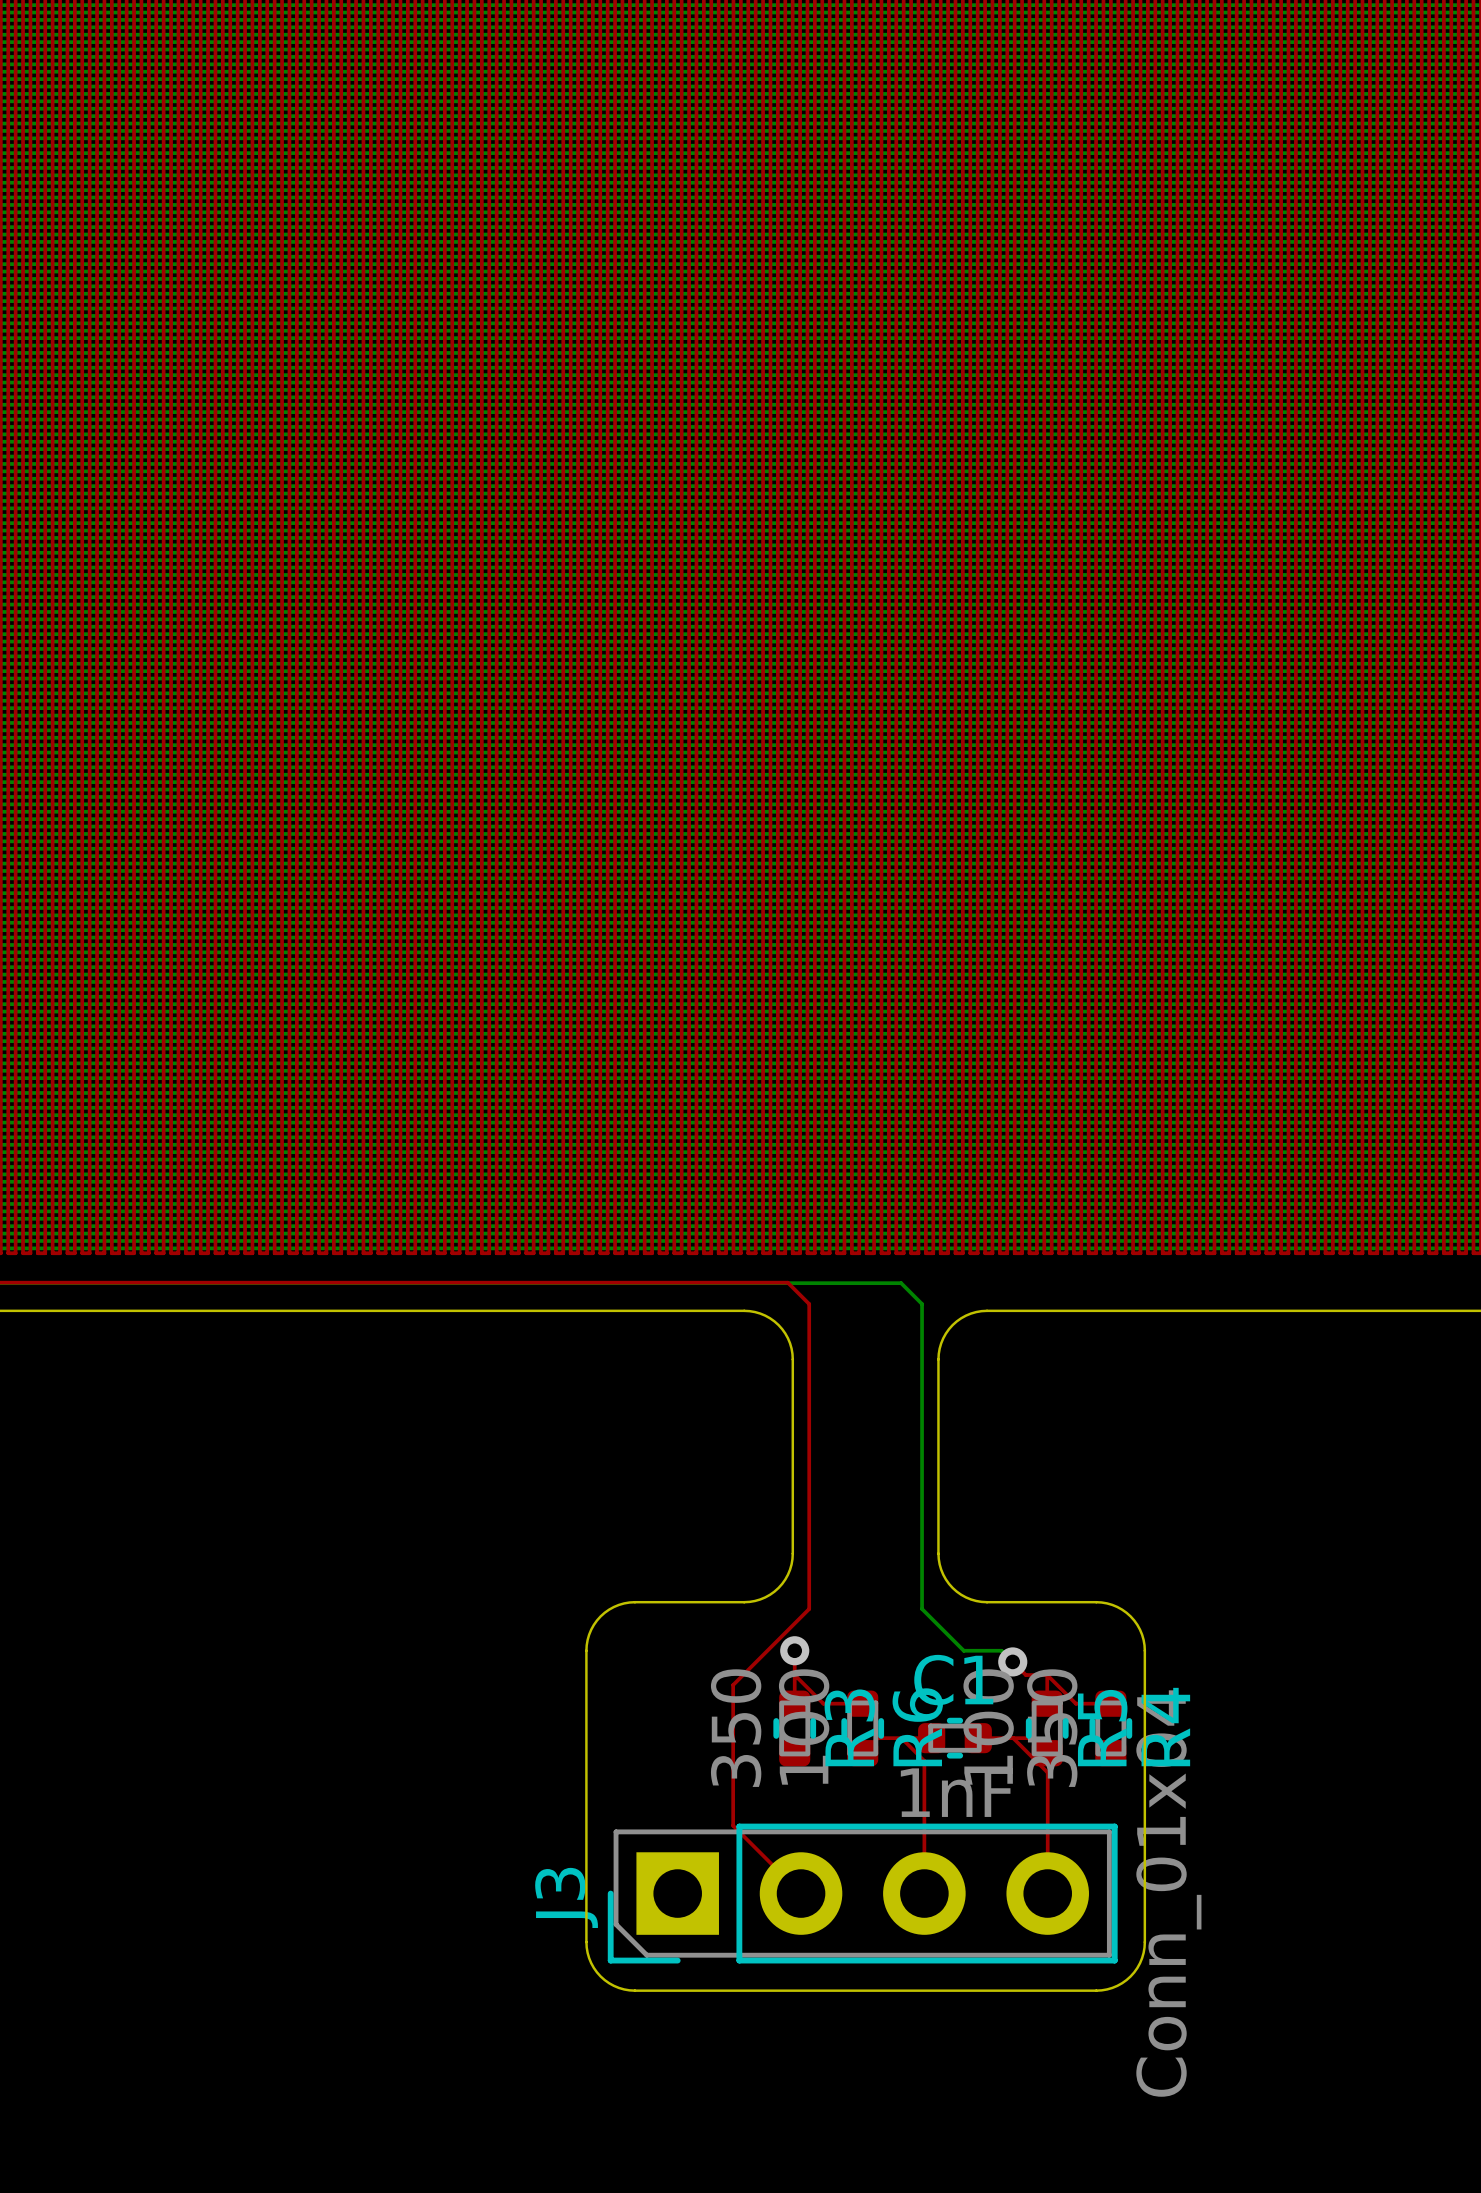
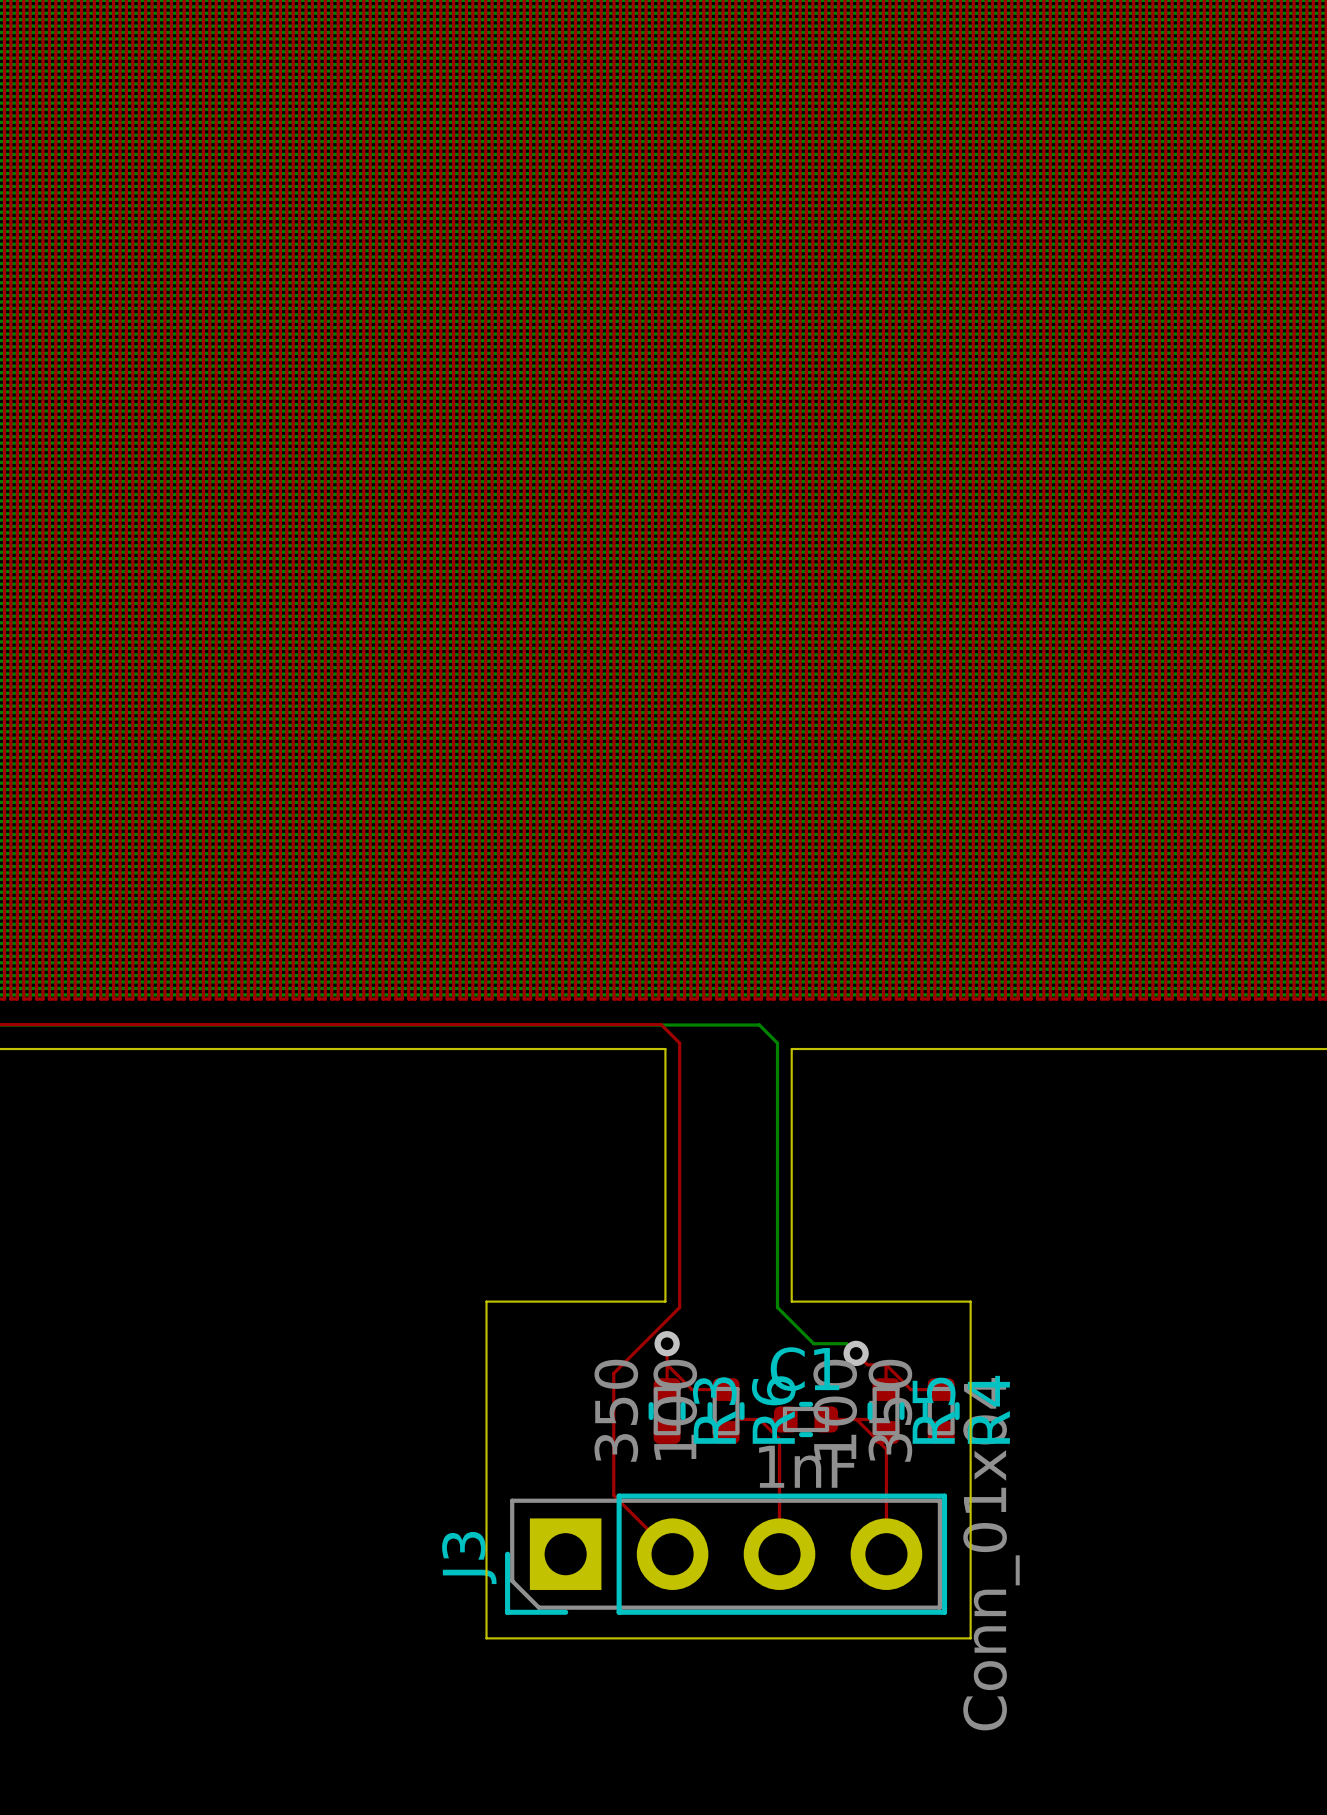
board edge: (744, 1310) (765, 1315) (778, 1325) (790, 1343) (792, 1359) -> (623, 1049) (665, 1049) (665, 1091)
board edge: (987, 1310) (965, 1315) (952, 1325) (941, 1343) (938, 1359) -> (833, 1049) (791, 1049) (791, 1091)
board edge: (792, 1553) (787, 1574) (778, 1587) (760, 1599) (744, 1602) -> (665, 1259) (665, 1301) (623, 1301)
board edge: (938, 1553) (943, 1574) (952, 1587) (970, 1599) (987, 1602) -> (791, 1259) (791, 1301) (833, 1301)
board edge: (634, 1602) (613, 1607) (600, 1616) (589, 1634) (586, 1650) -> (528, 1301) (486, 1301) (486, 1343)
board edge: (1096, 1602) (1112, 1604) (1130, 1616) (1142, 1634) (1144, 1650) -> (928, 1301) (970, 1301) (970, 1343)
board edge: (586, 1942) (591, 1963) (600, 1976) (618, 1987) (634, 1990) -> (486, 1596) (486, 1638) (528, 1638)
board edge: (1144, 1942) (1140, 1963) (1130, 1976) (1112, 1987) (1096, 1990) -> (970, 1596) (970, 1638) (928, 1638)

